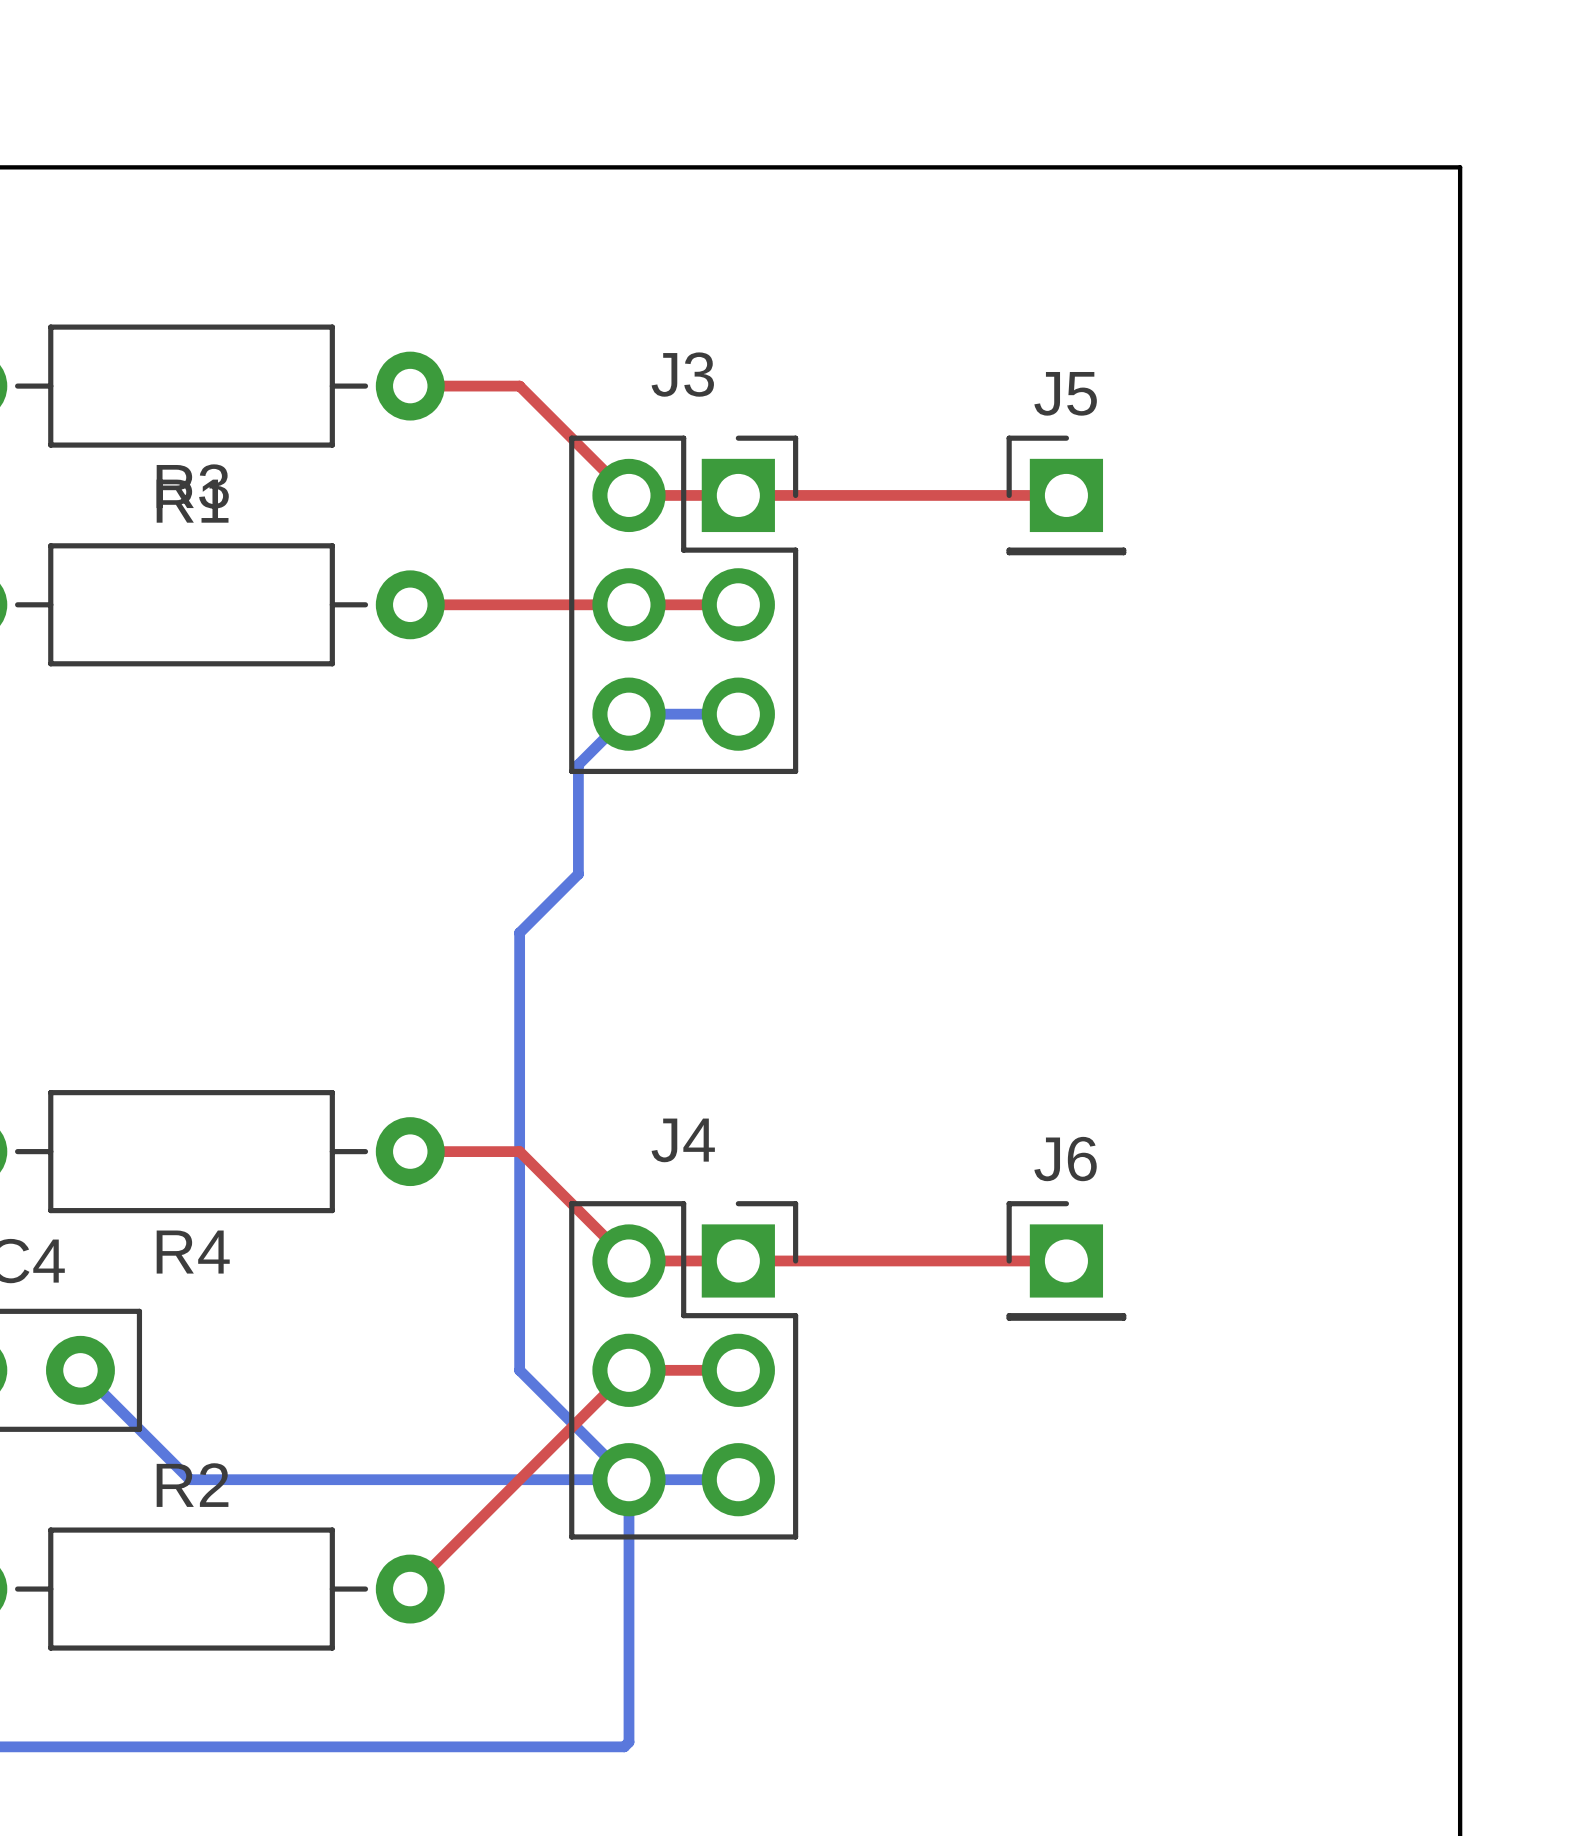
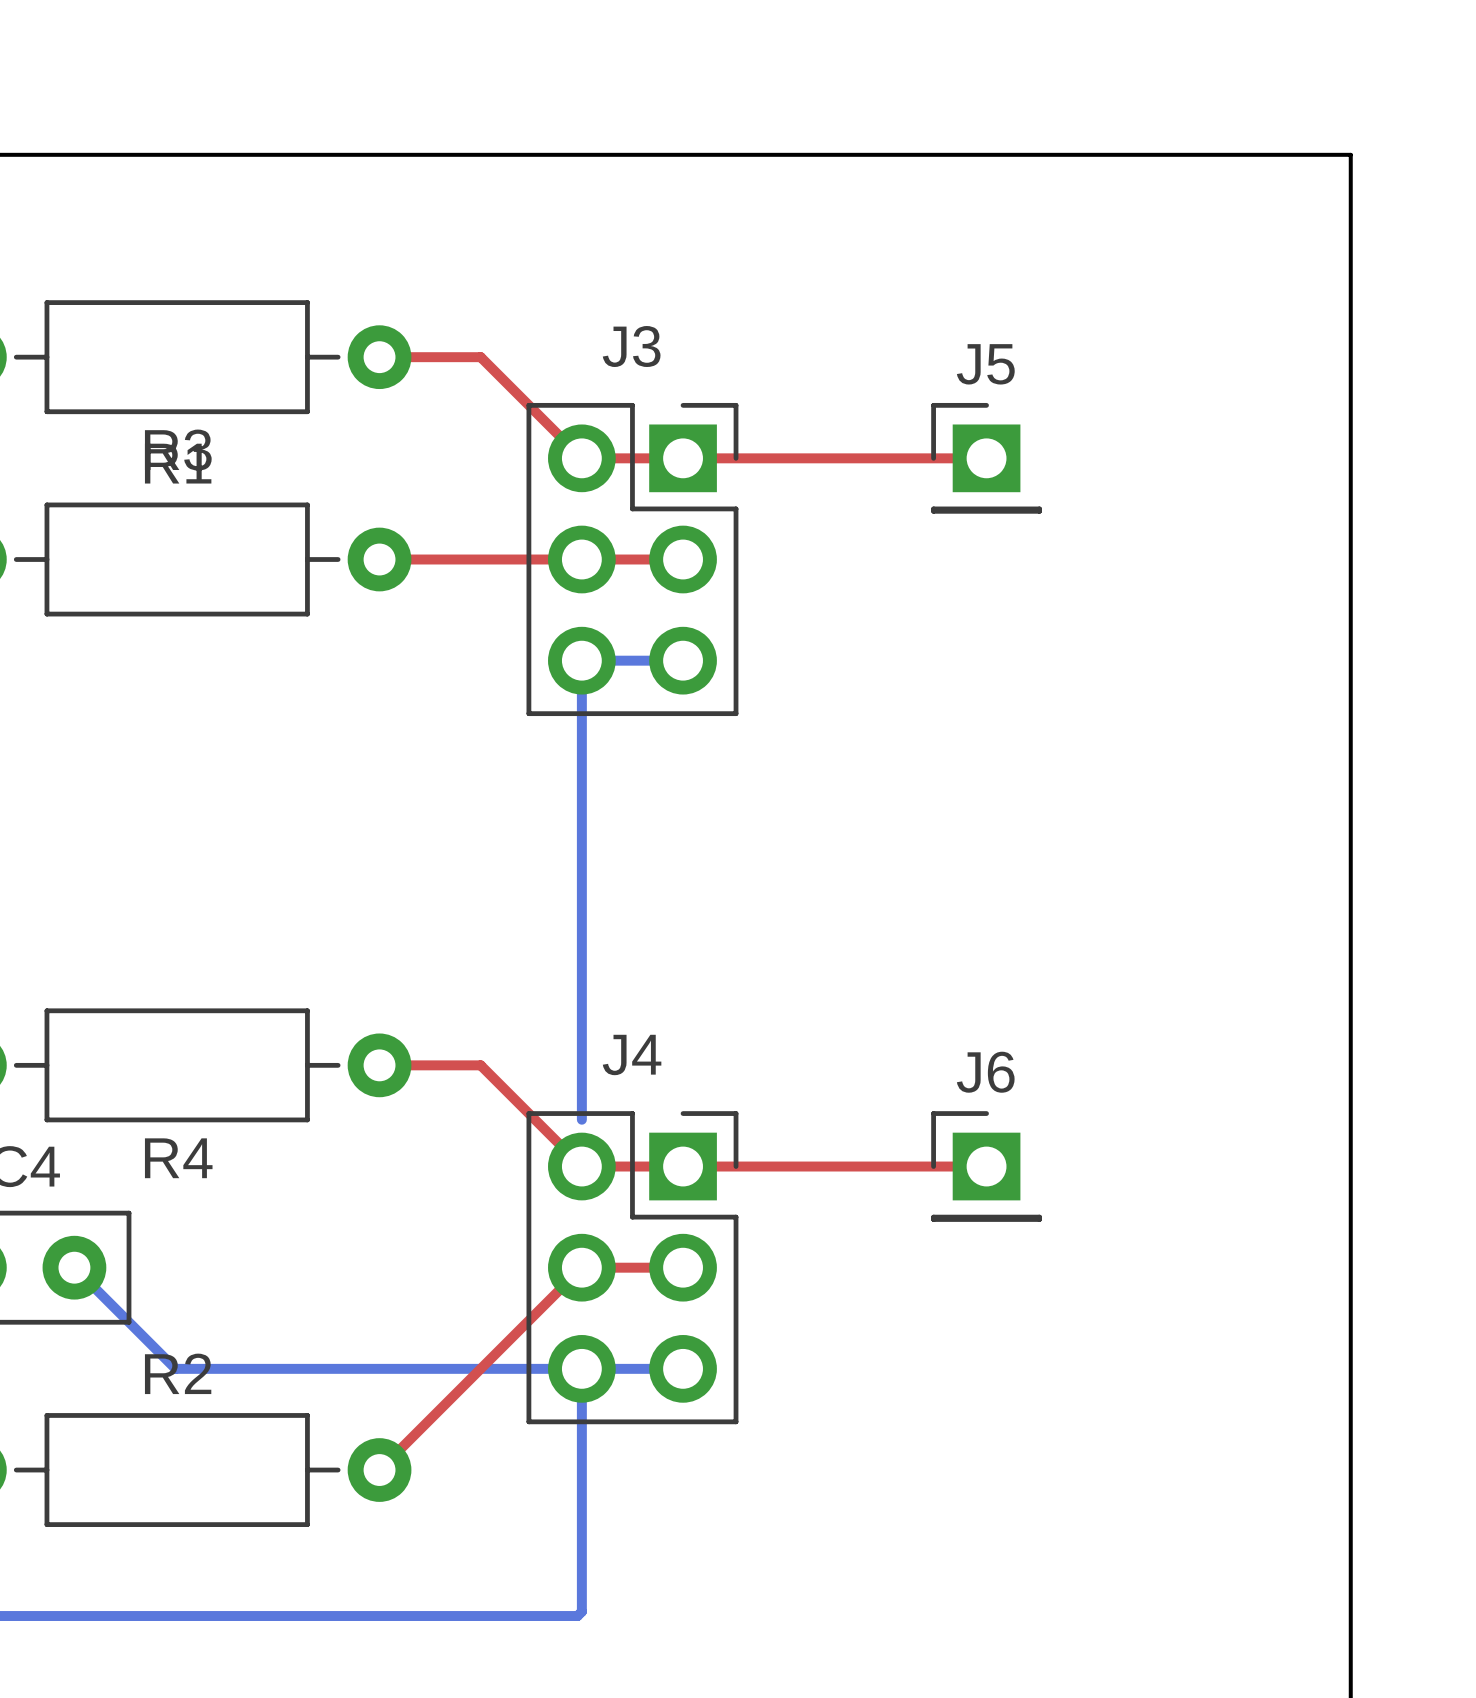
bottom track: (628, 714) (578, 764) (578, 874) (519, 932) (519, 1370) (628, 1479) -> (581, 660) (581, 1119)

